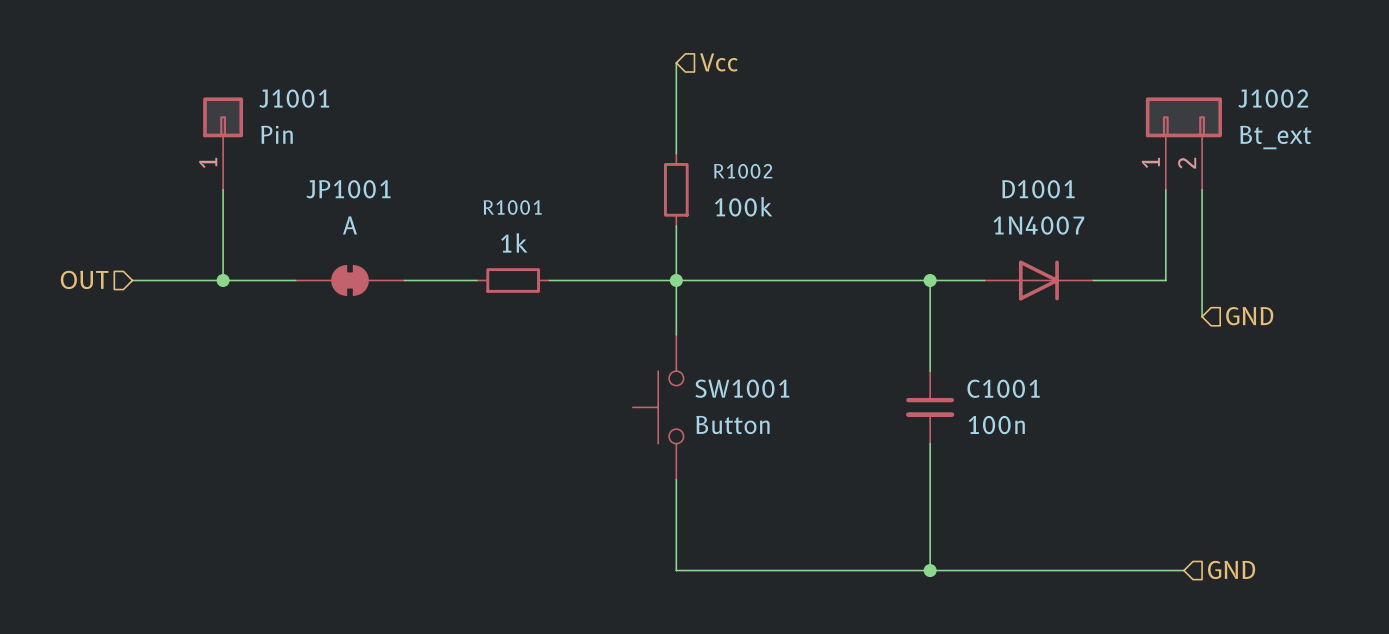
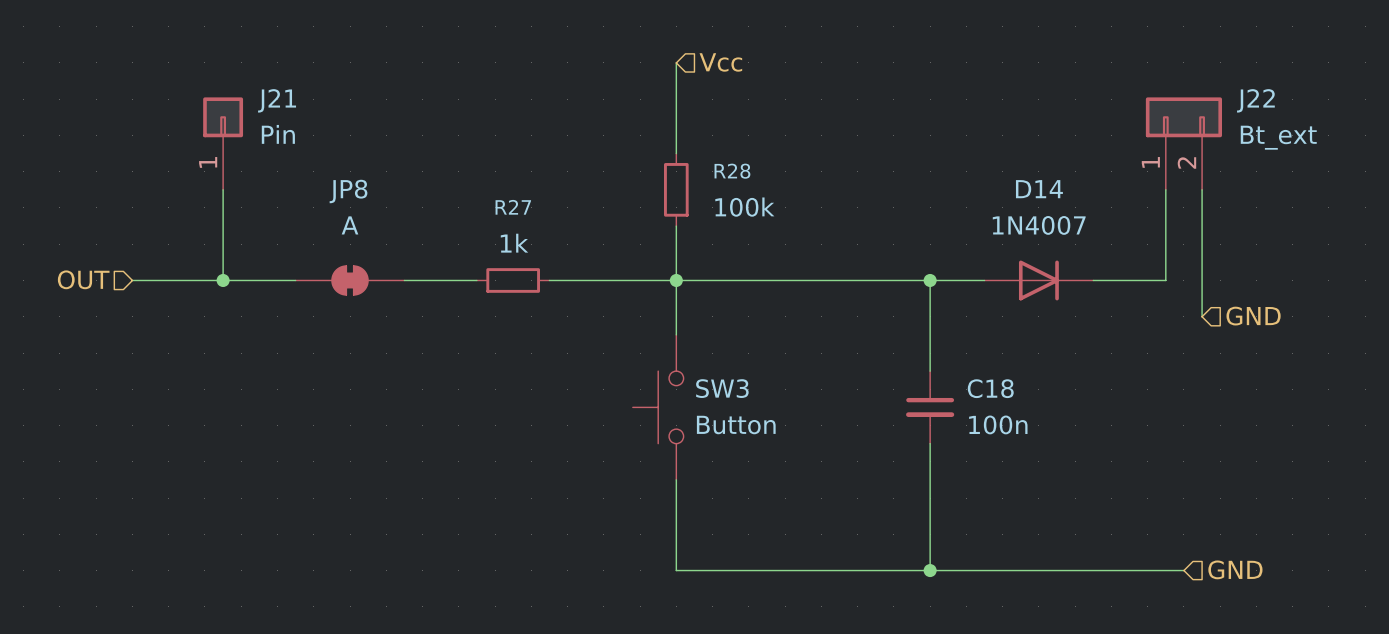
J1001 name: J1001 (294, 98) -> J21 (277, 100)
J1002 name: J1002 (1273, 98) -> J22 (1255, 100)
R1002 name: R1002 (743, 171) -> R28 (732, 171)
JP1001 name: JP1001 (348, 189) -> JP8 (348, 191)
D1001 name: D1001 (1038, 189) -> D14 (1039, 189)
R1001 name: R1001 (512, 207) -> R27 (513, 207)
SW1001 name: SW1001 (742, 388) -> SW3 (722, 388)
C1001 name: C1001 (1003, 388) -> C18 (990, 388)

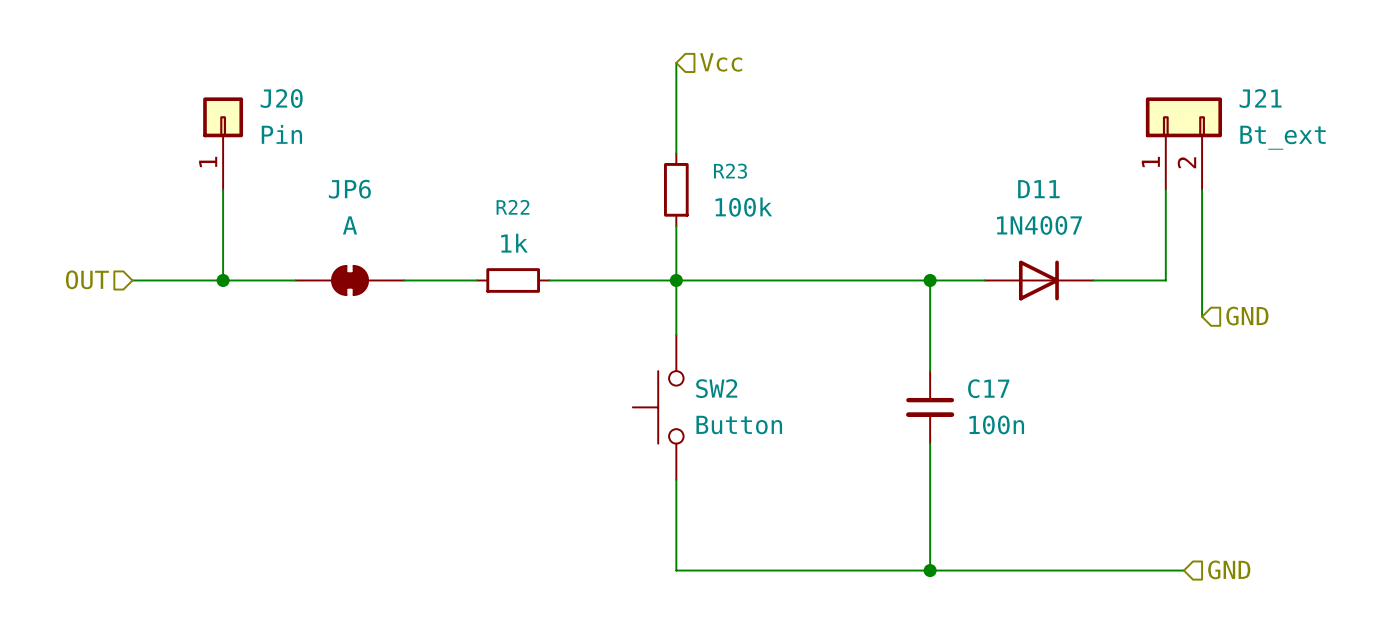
J21 name: J21 (277, 100) -> J20 (281, 98)
J22 name: J22 (1255, 100) -> J21 (1260, 98)
R28 name: R28 (732, 171) -> R23 (730, 171)
D14 name: D14 (1039, 189) -> D11 (1038, 189)
JP8 name: JP8 (348, 191) -> JP6 (349, 189)
R27 name: R27 (513, 207) -> R22 (513, 207)
SW3 name: SW3 (722, 388) -> SW2 (716, 388)
C18 name: C18 (990, 388) -> C17 (988, 388)

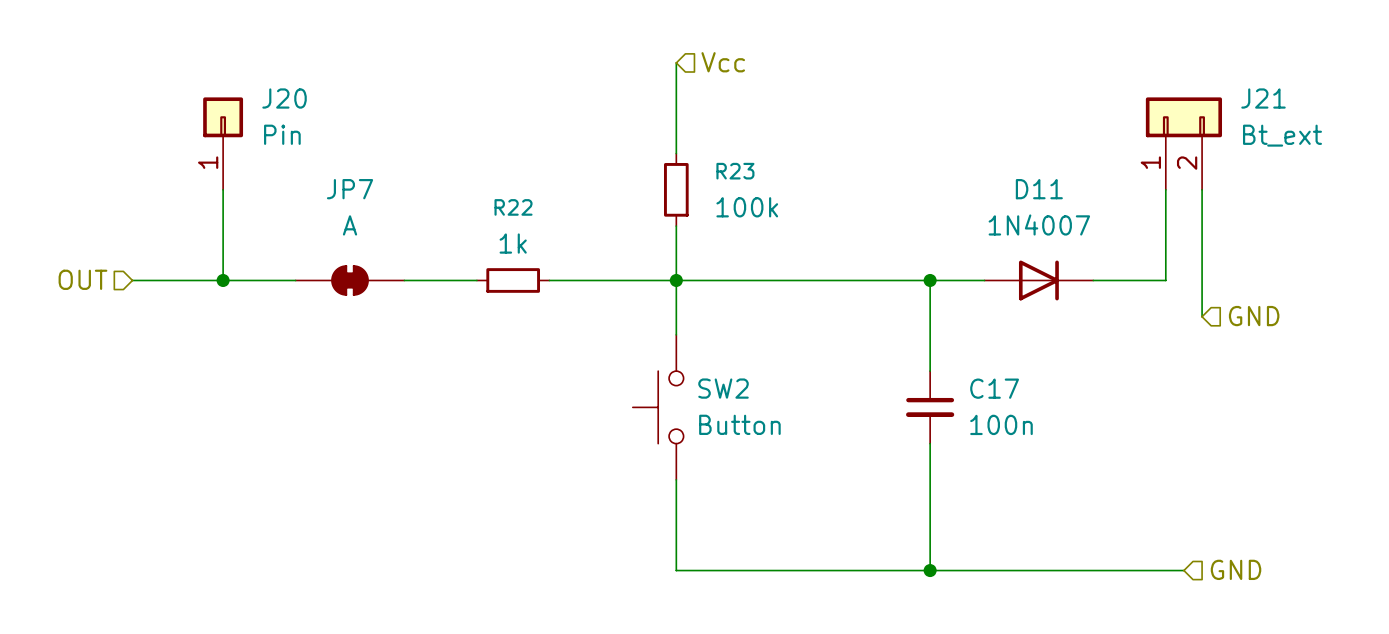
JP6 name: JP6 (349, 189) -> JP7 (350, 189)

